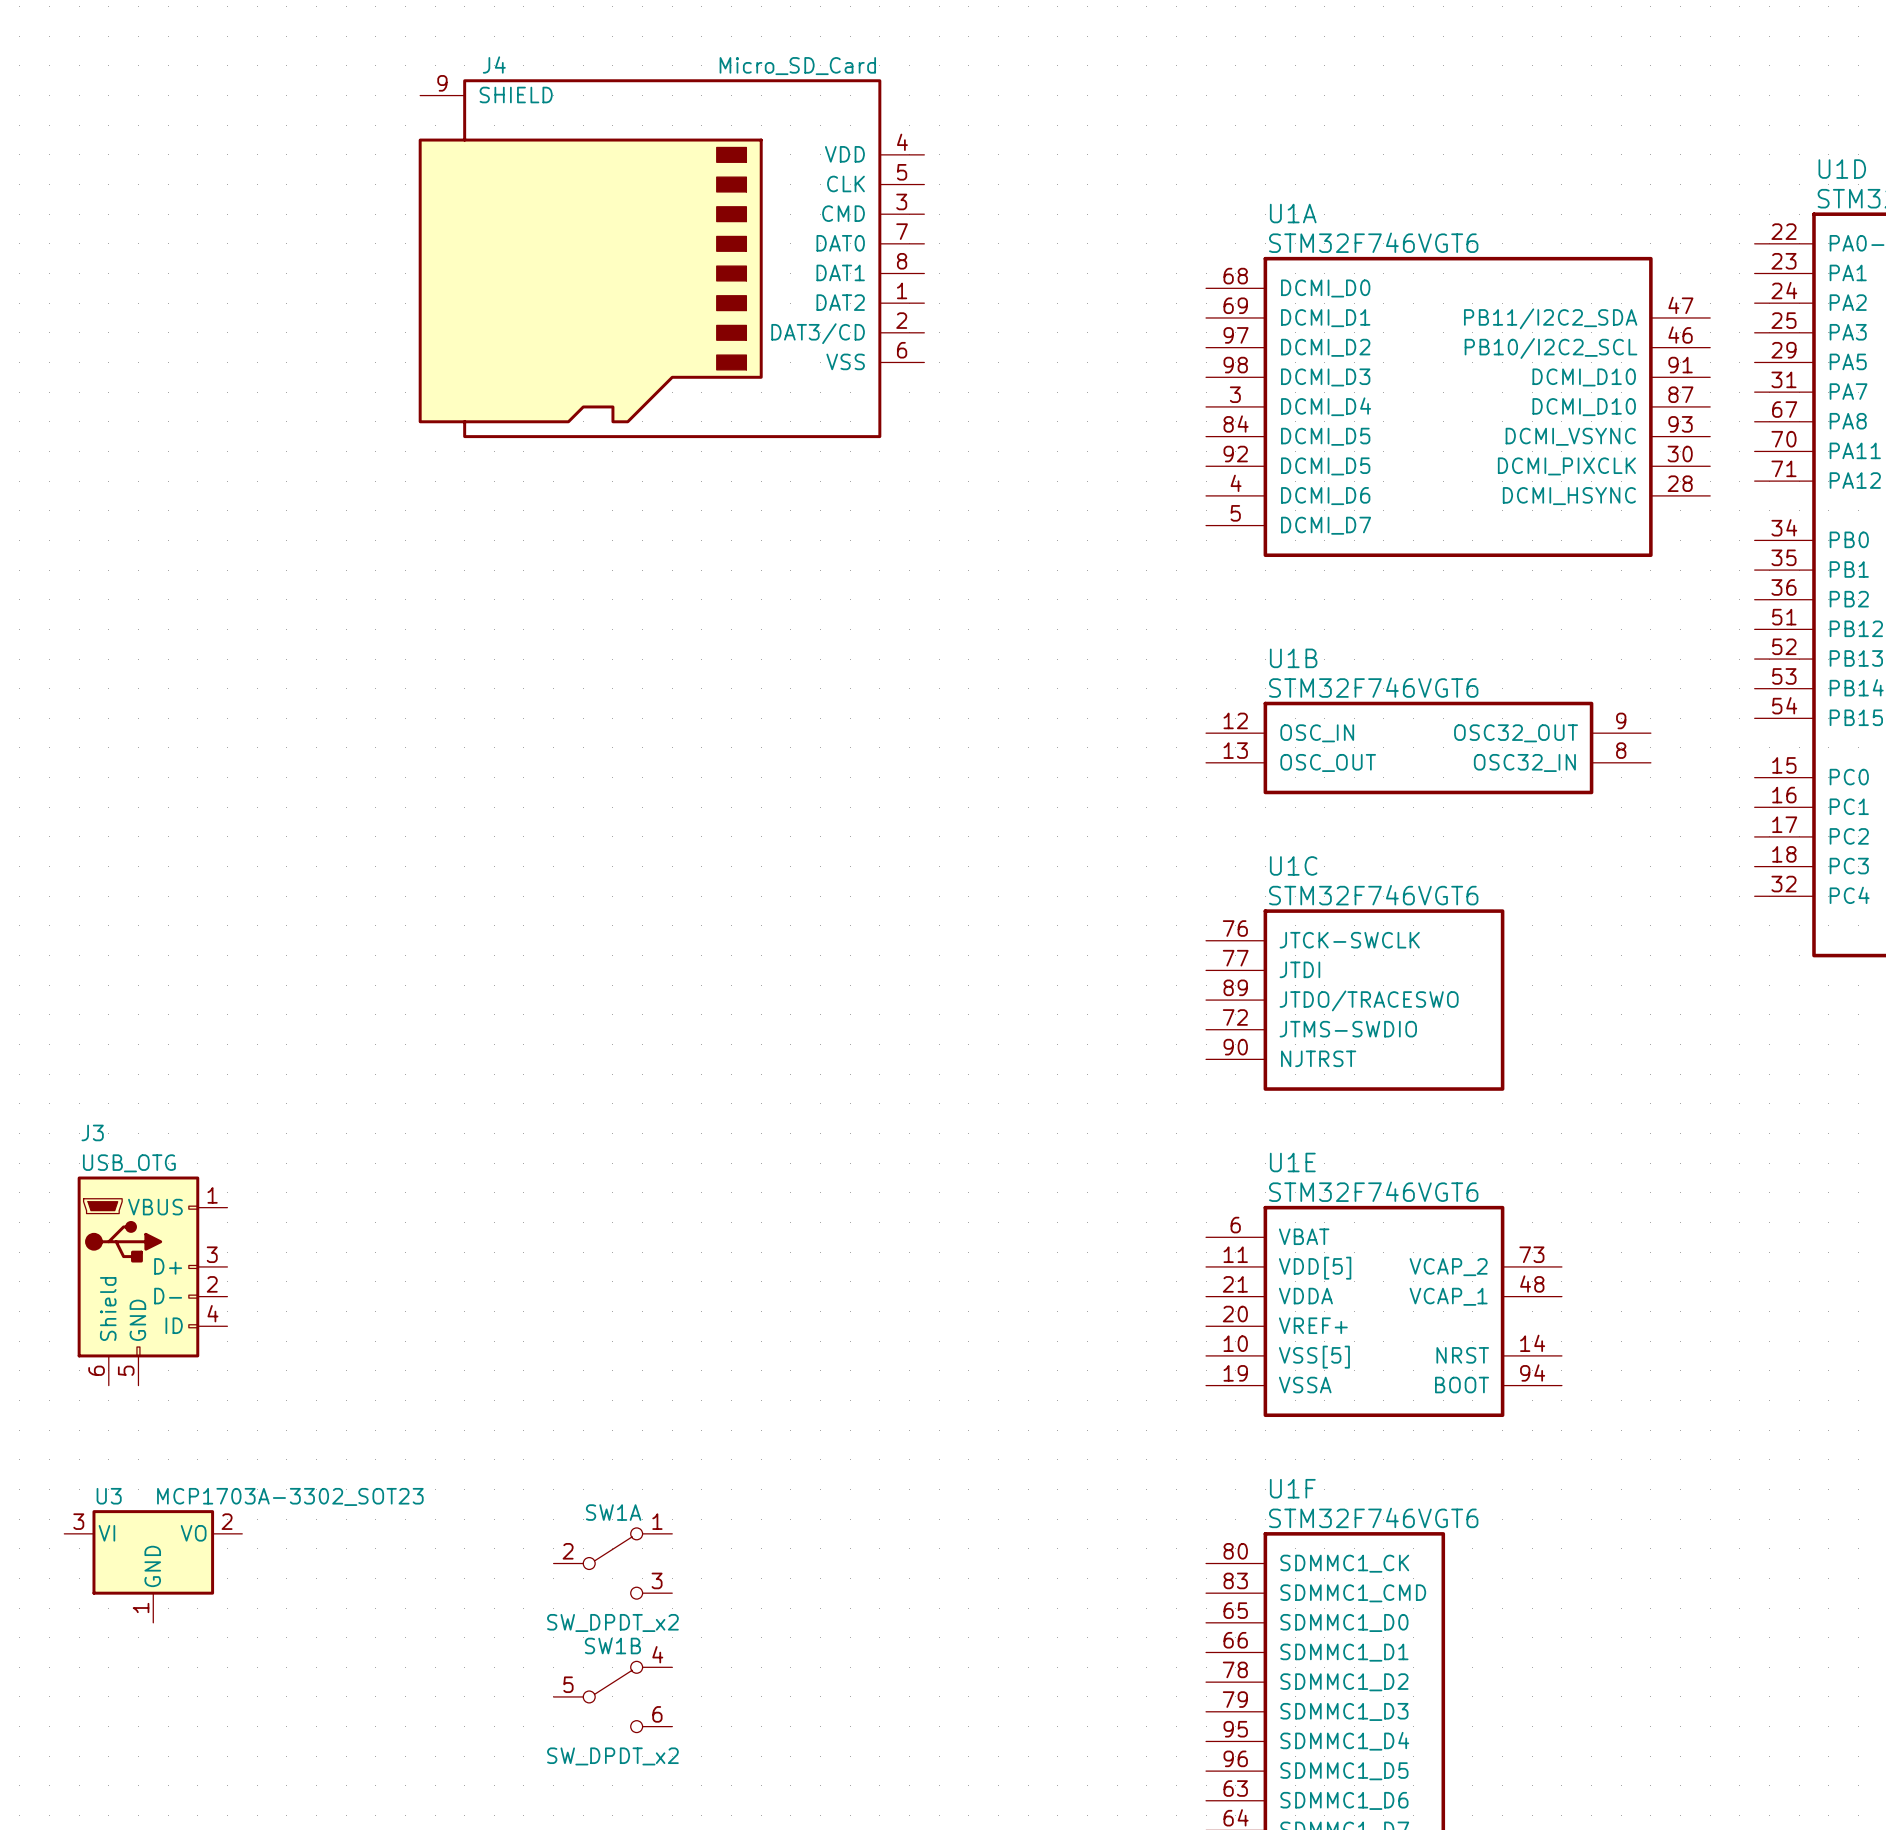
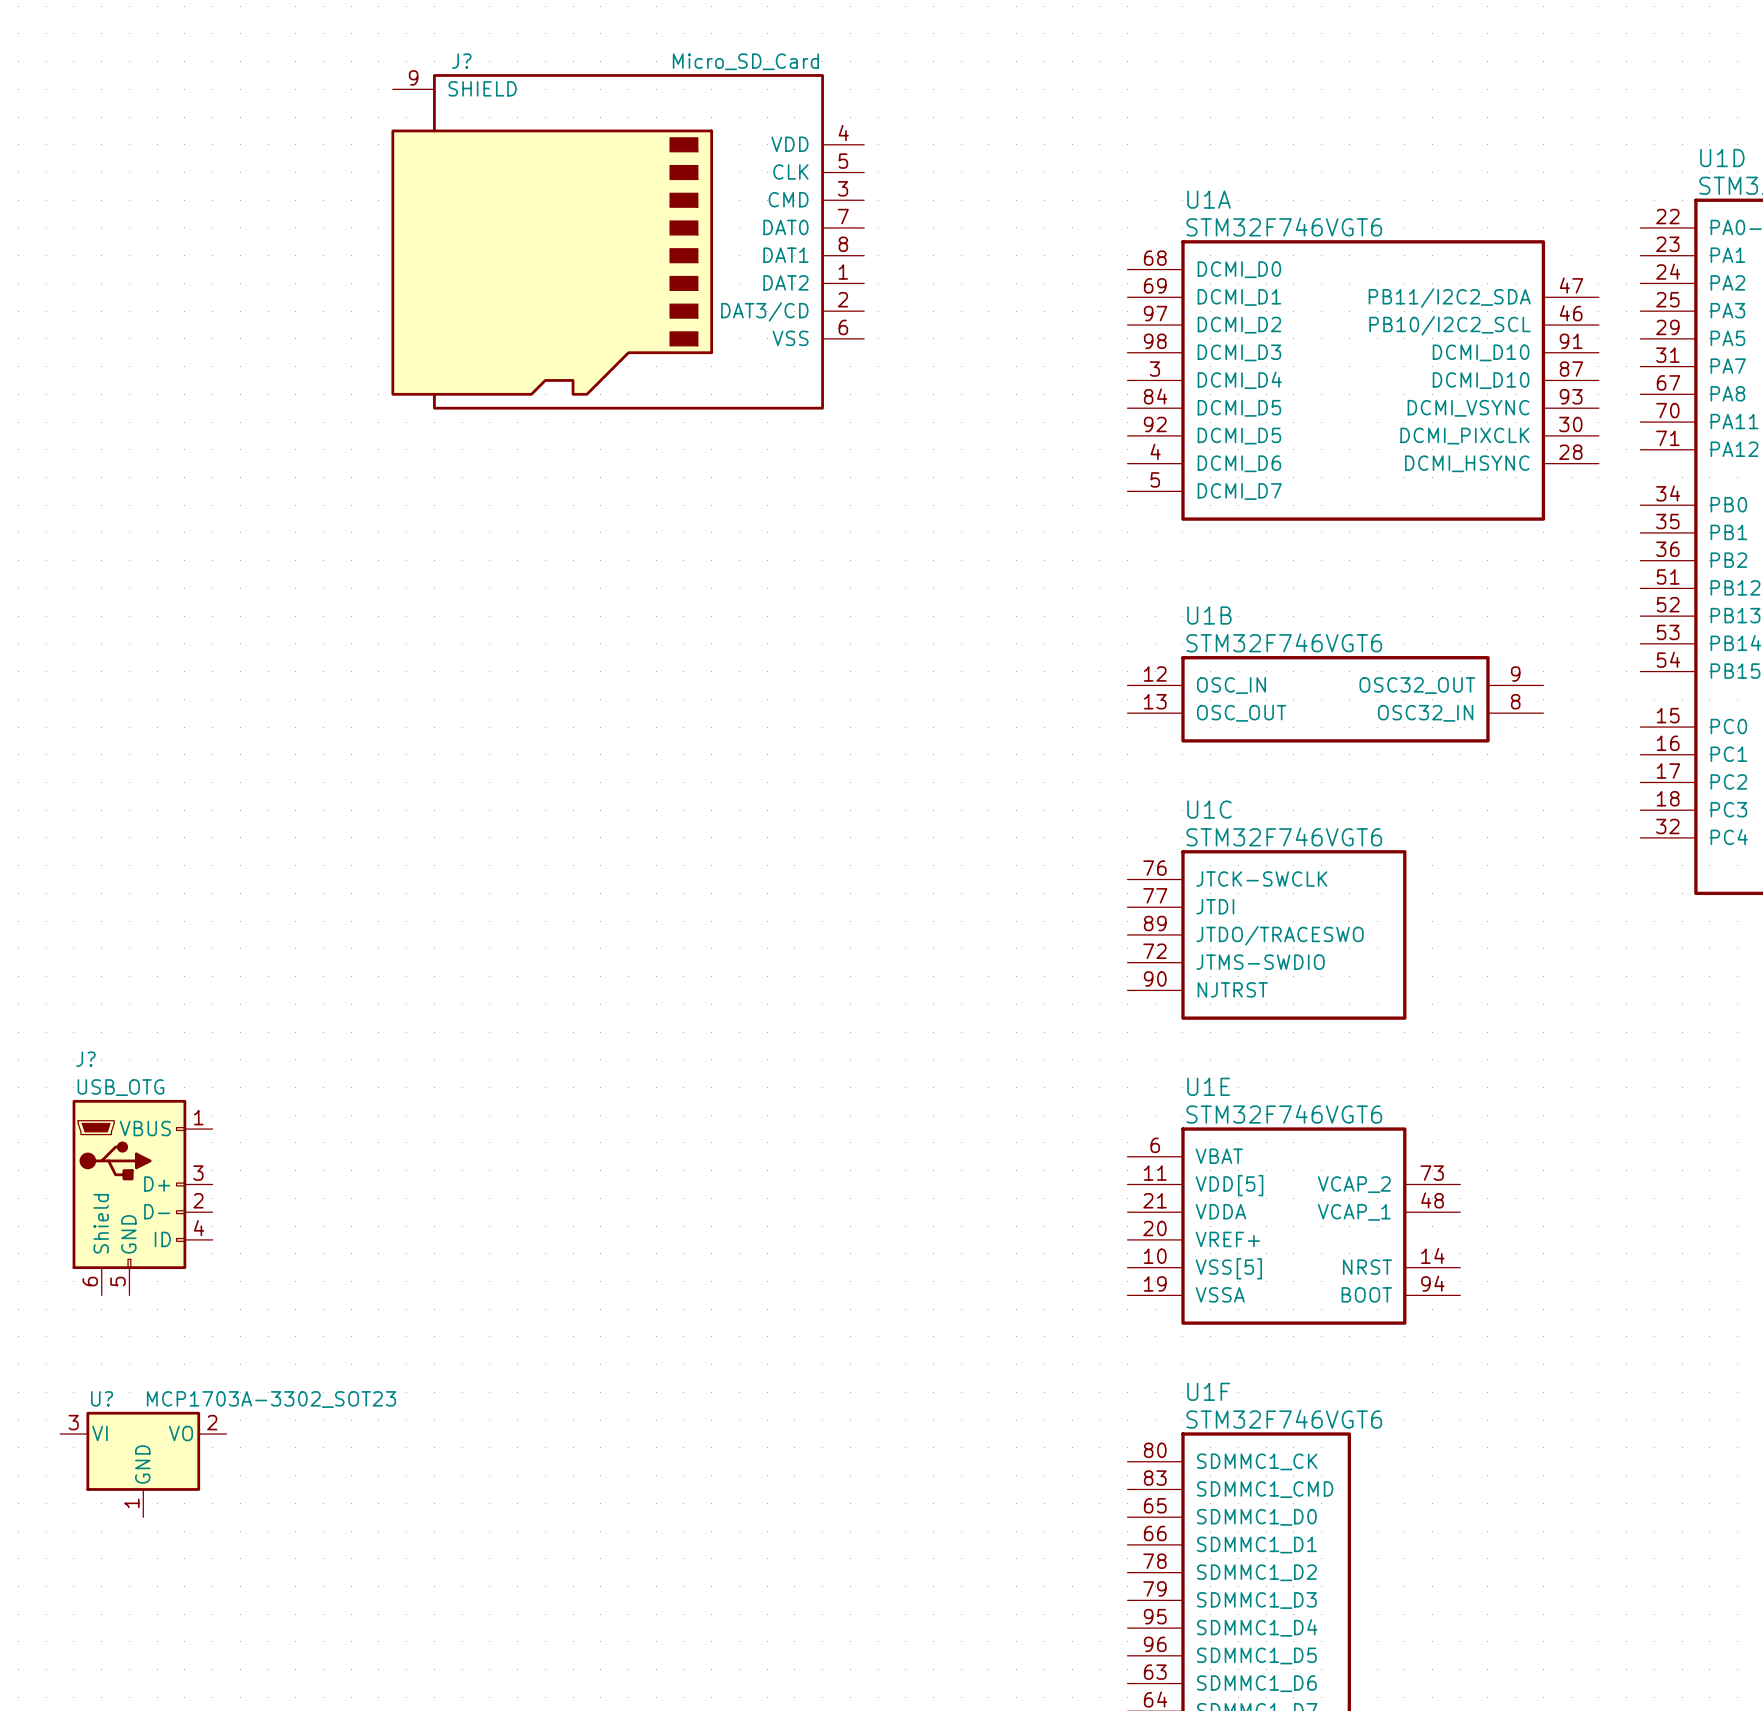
J4 name: J4 (494, 65) -> J? (461, 61)
J3 name: J3 (92, 1132) -> J? (85, 1059)
U3 name: U3 (109, 1496) -> U? (102, 1398)
SW1A: SW_DPDT_x2 (612, 1563) -> none
SW1B: SW_DPDT_x2 (612, 1696) -> none

